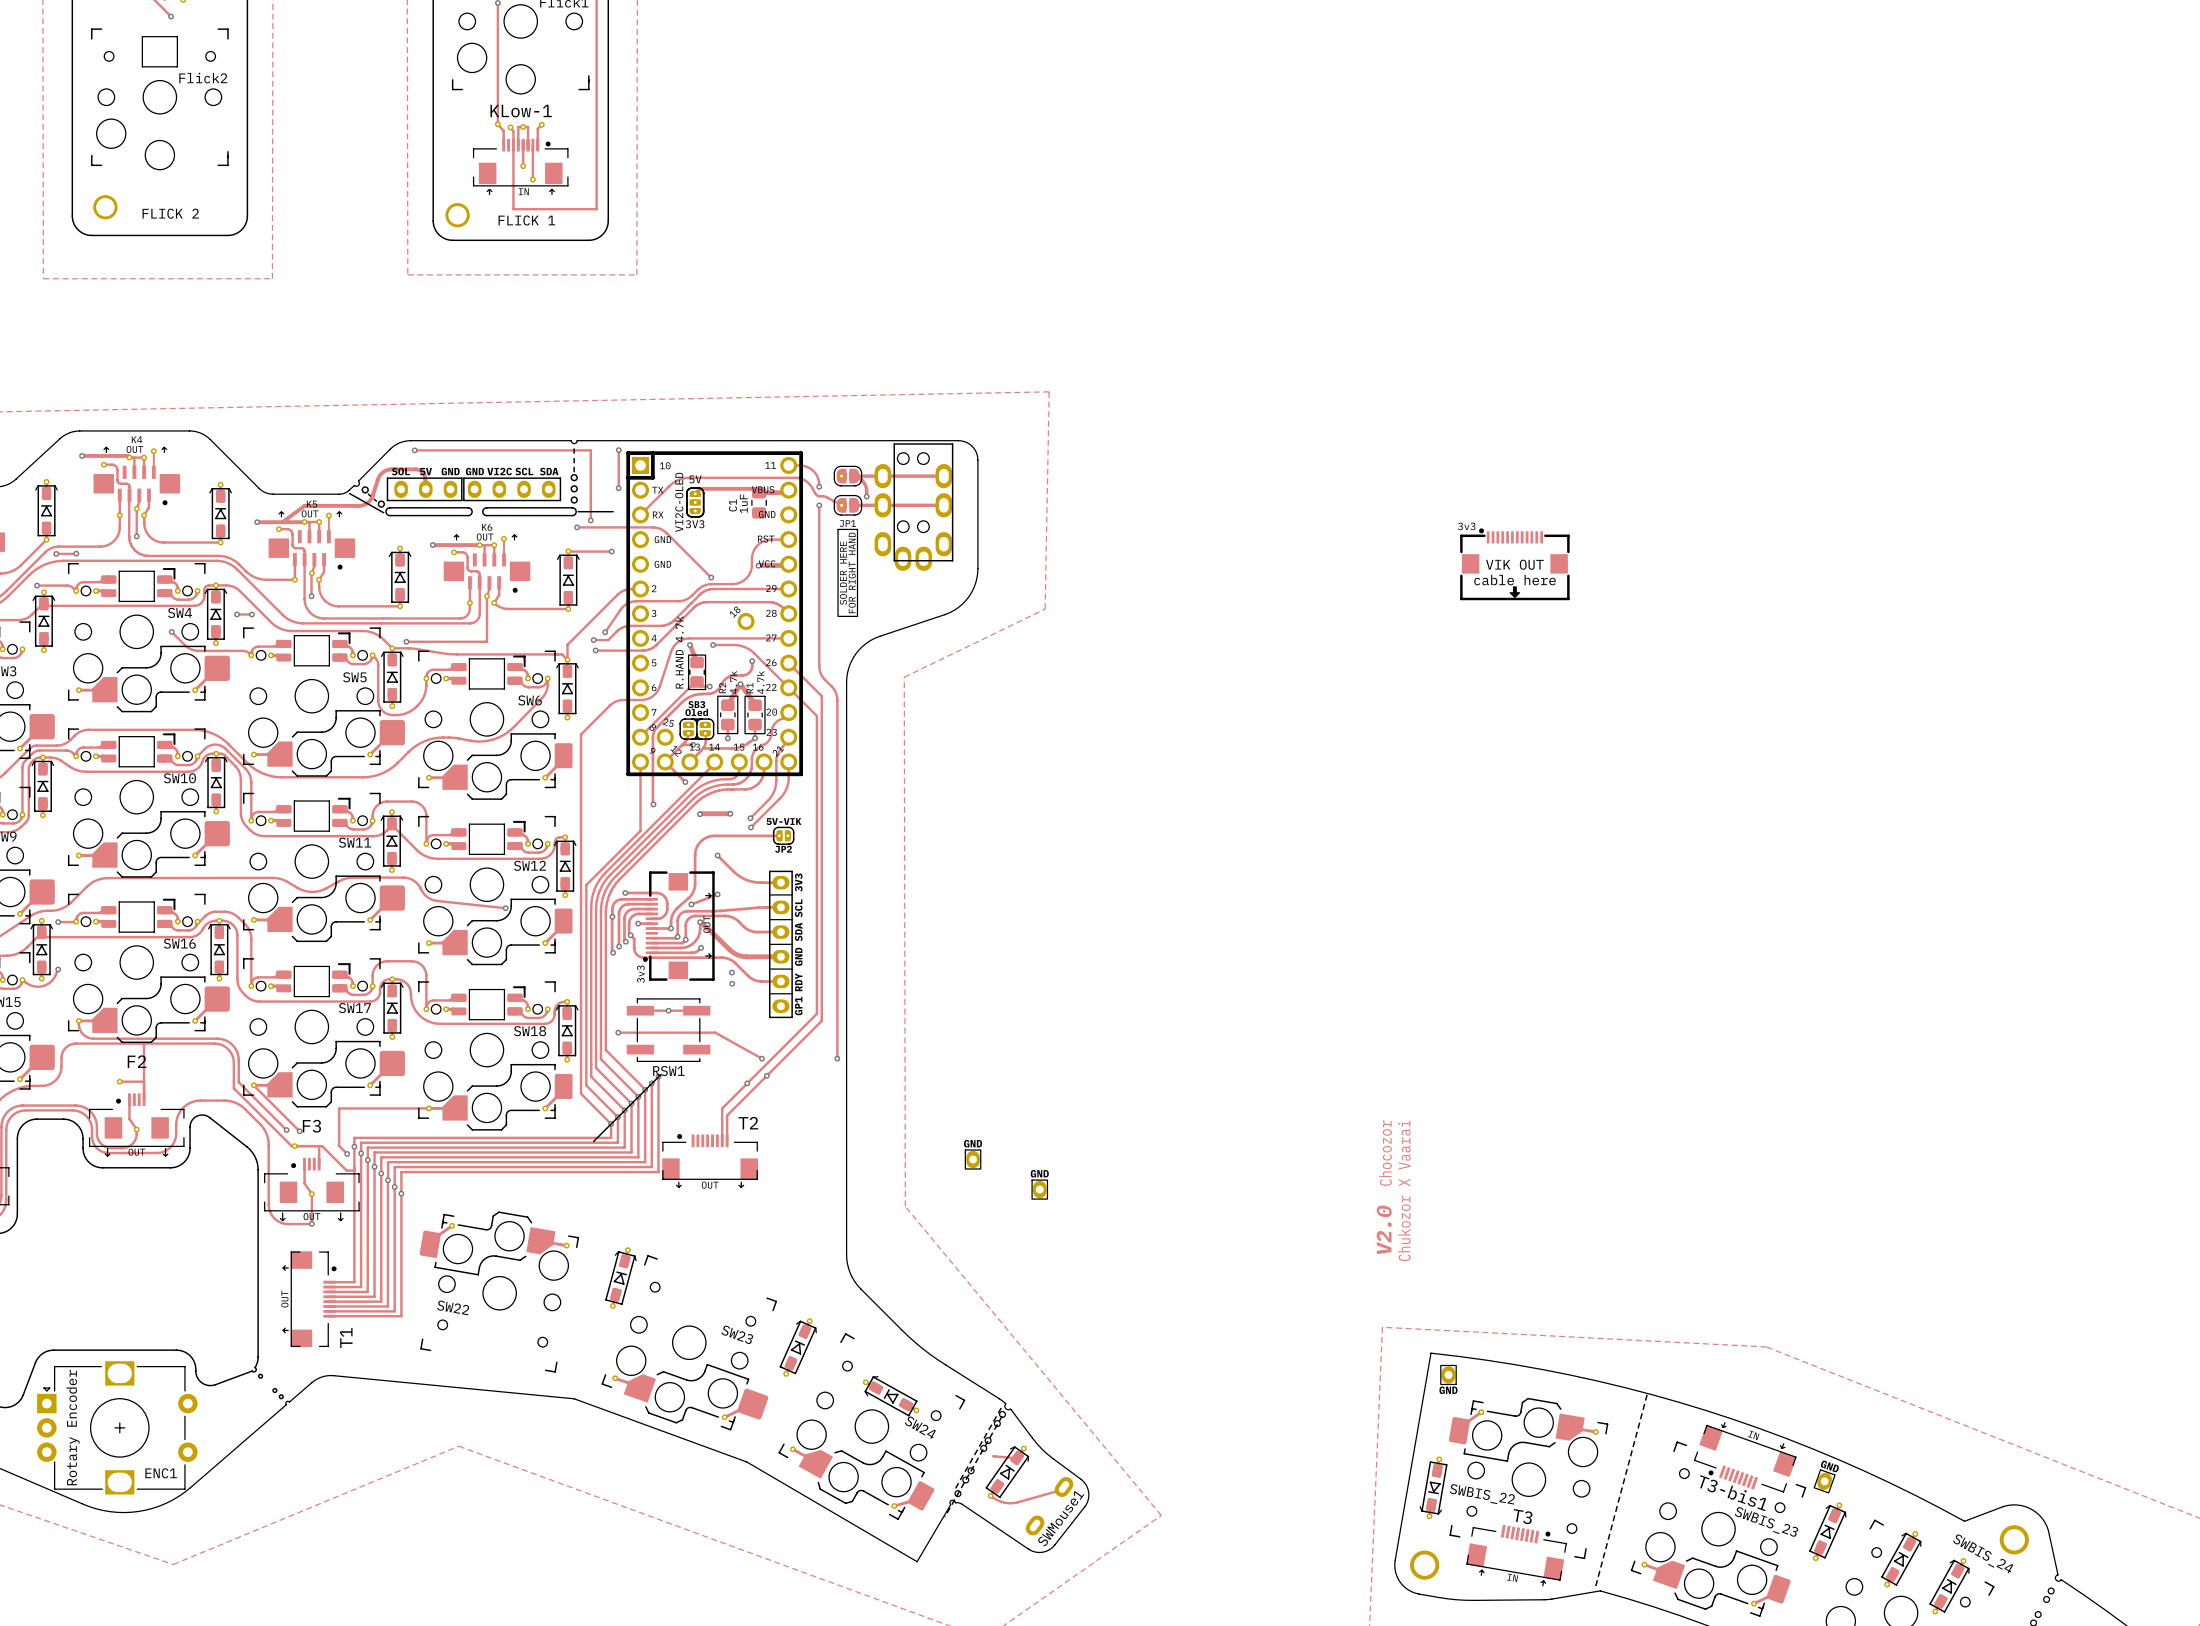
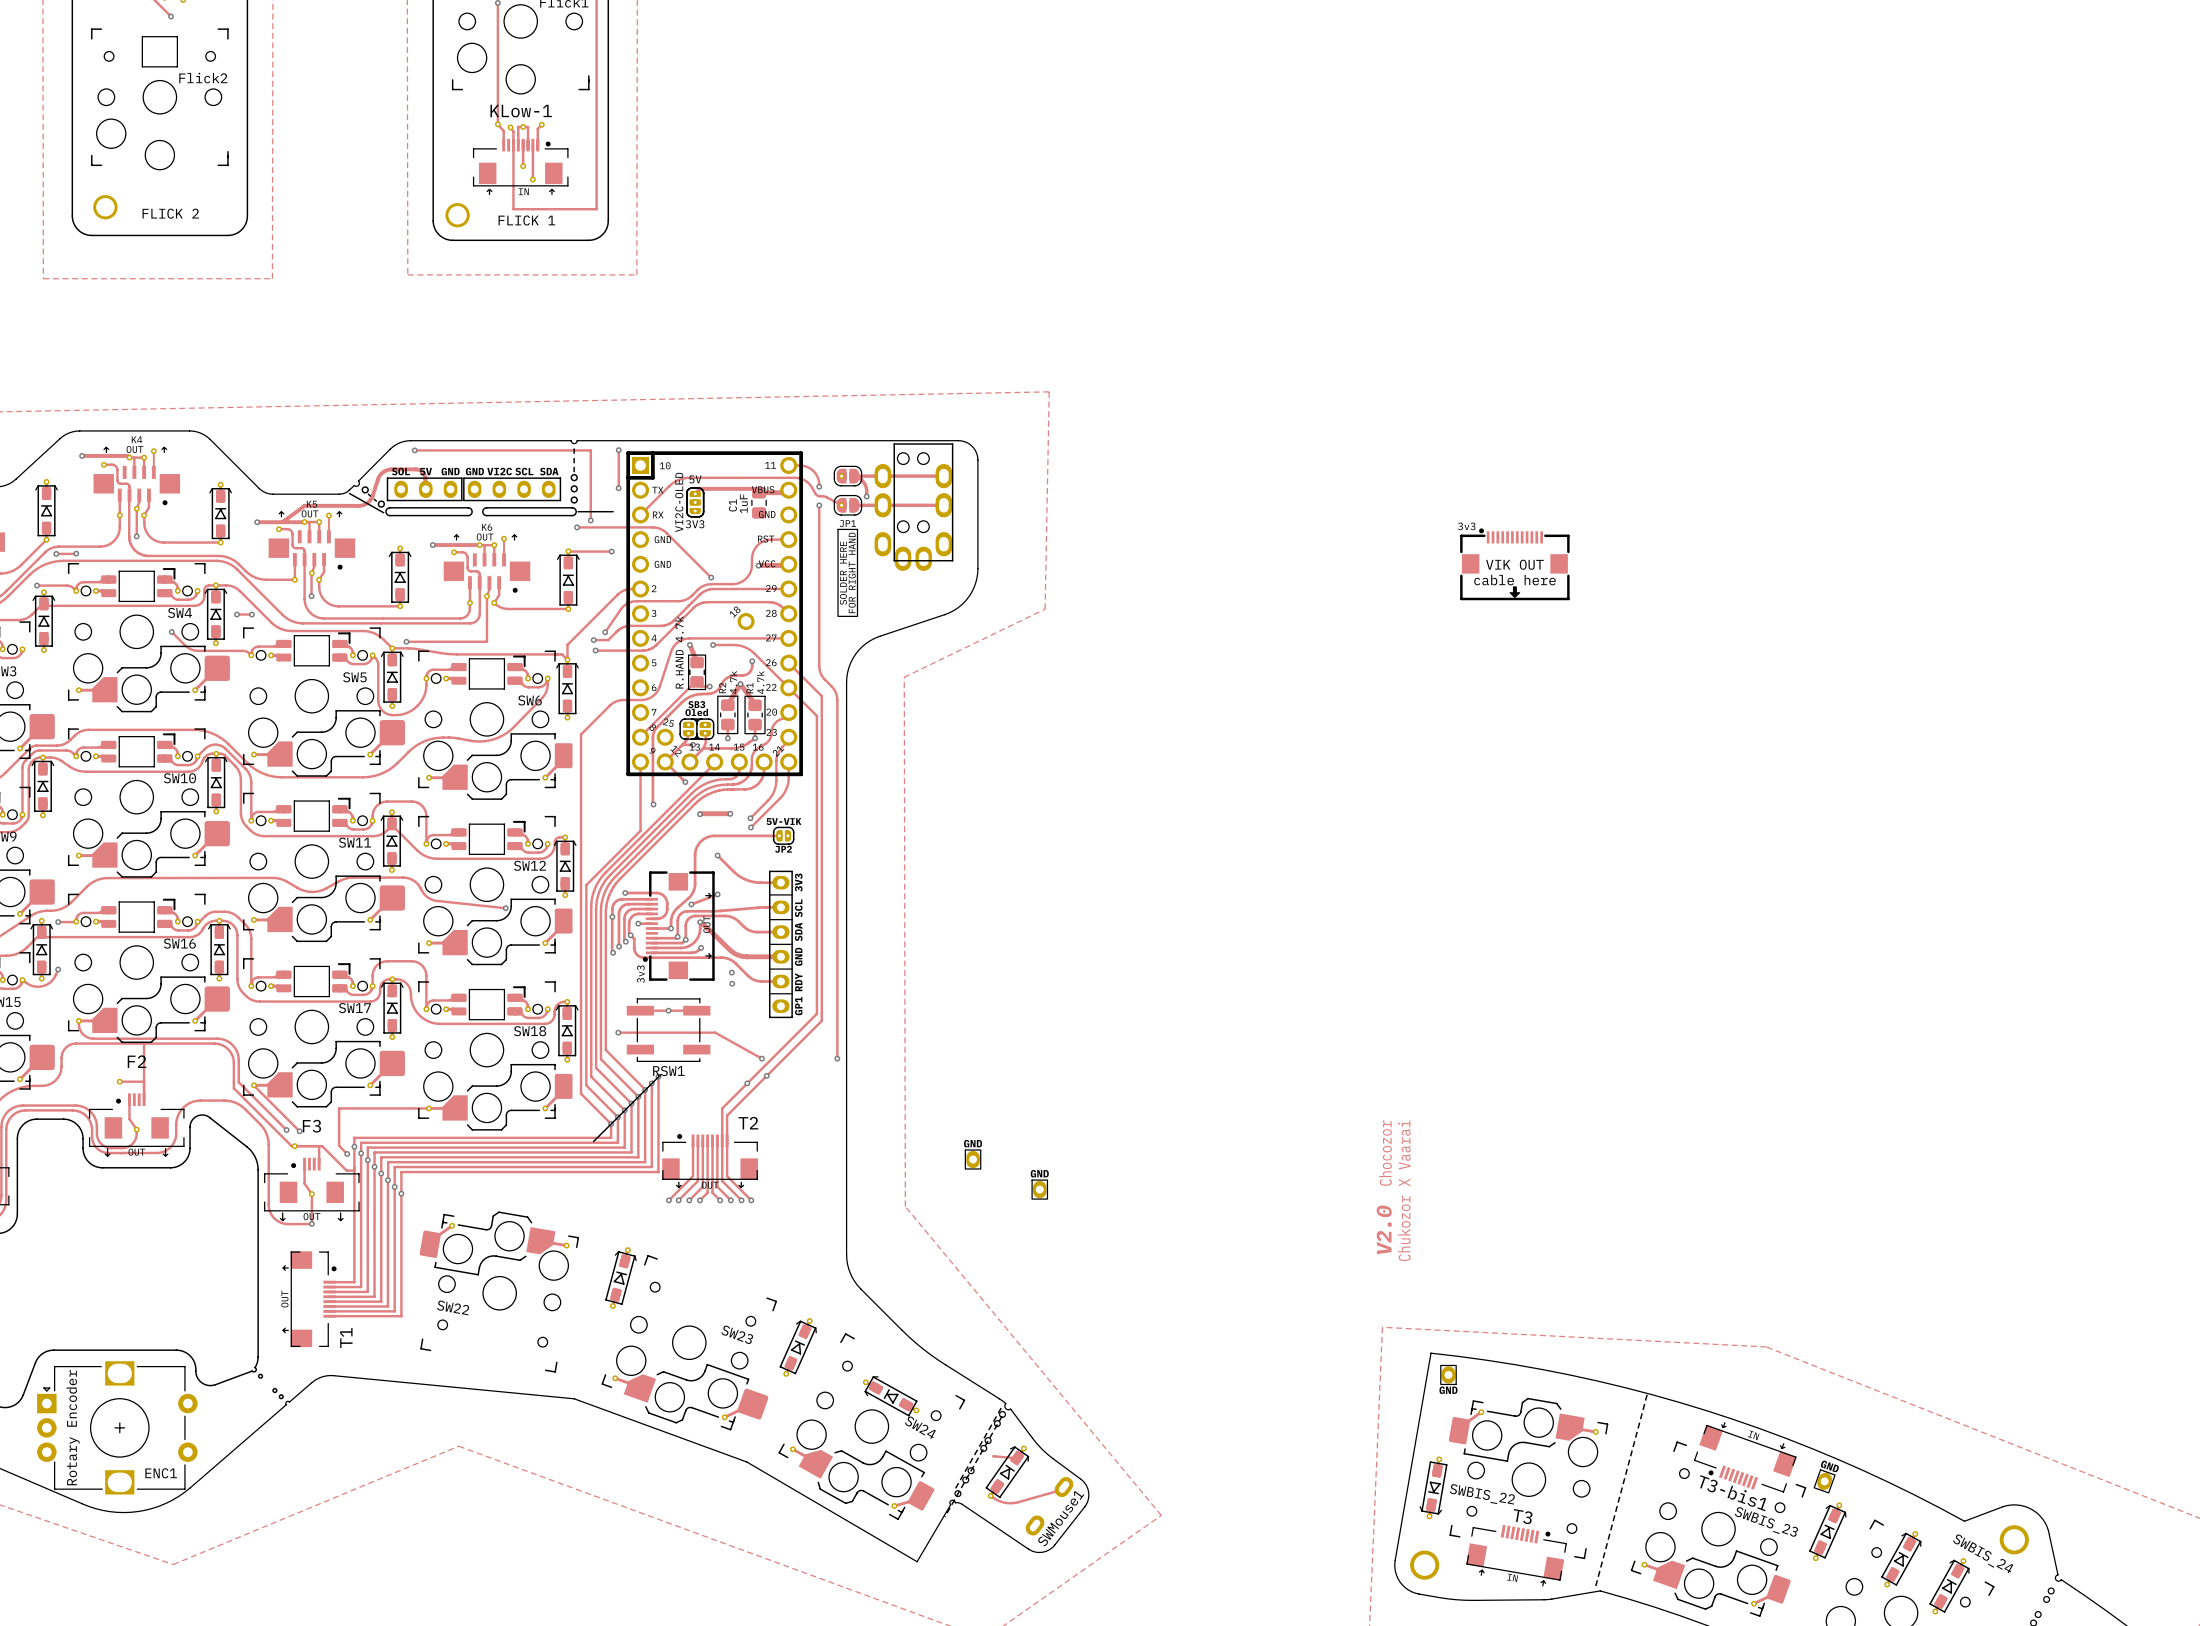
track: none -> (693, 1140) (693, 1176) (668, 1200)
track: none -> (697, 1140) (697, 1180)
track: none -> (702, 1140) (702, 1186) (689, 1200)
track: none -> (707, 1140) (707, 1192) (700, 1200)
track: none -> (712, 1140) (712, 1192) (720, 1200)
track: none -> (717, 1140) (717, 1186) (730, 1200)
track: none -> (722, 1140) (722, 1180)
track: none -> (727, 1140) (727, 1176) (751, 1200)
track: none -> (697, 1181) (678, 1200)
track: none -> (722, 1181) (741, 1200)
via: none -> (668, 1200)
via: none -> (678, 1200)
via: none -> (689, 1200)
via: none -> (700, 1200)
via: none -> (720, 1200)
via: none -> (730, 1200)
via: none -> (741, 1200)
via: none -> (751, 1200)

